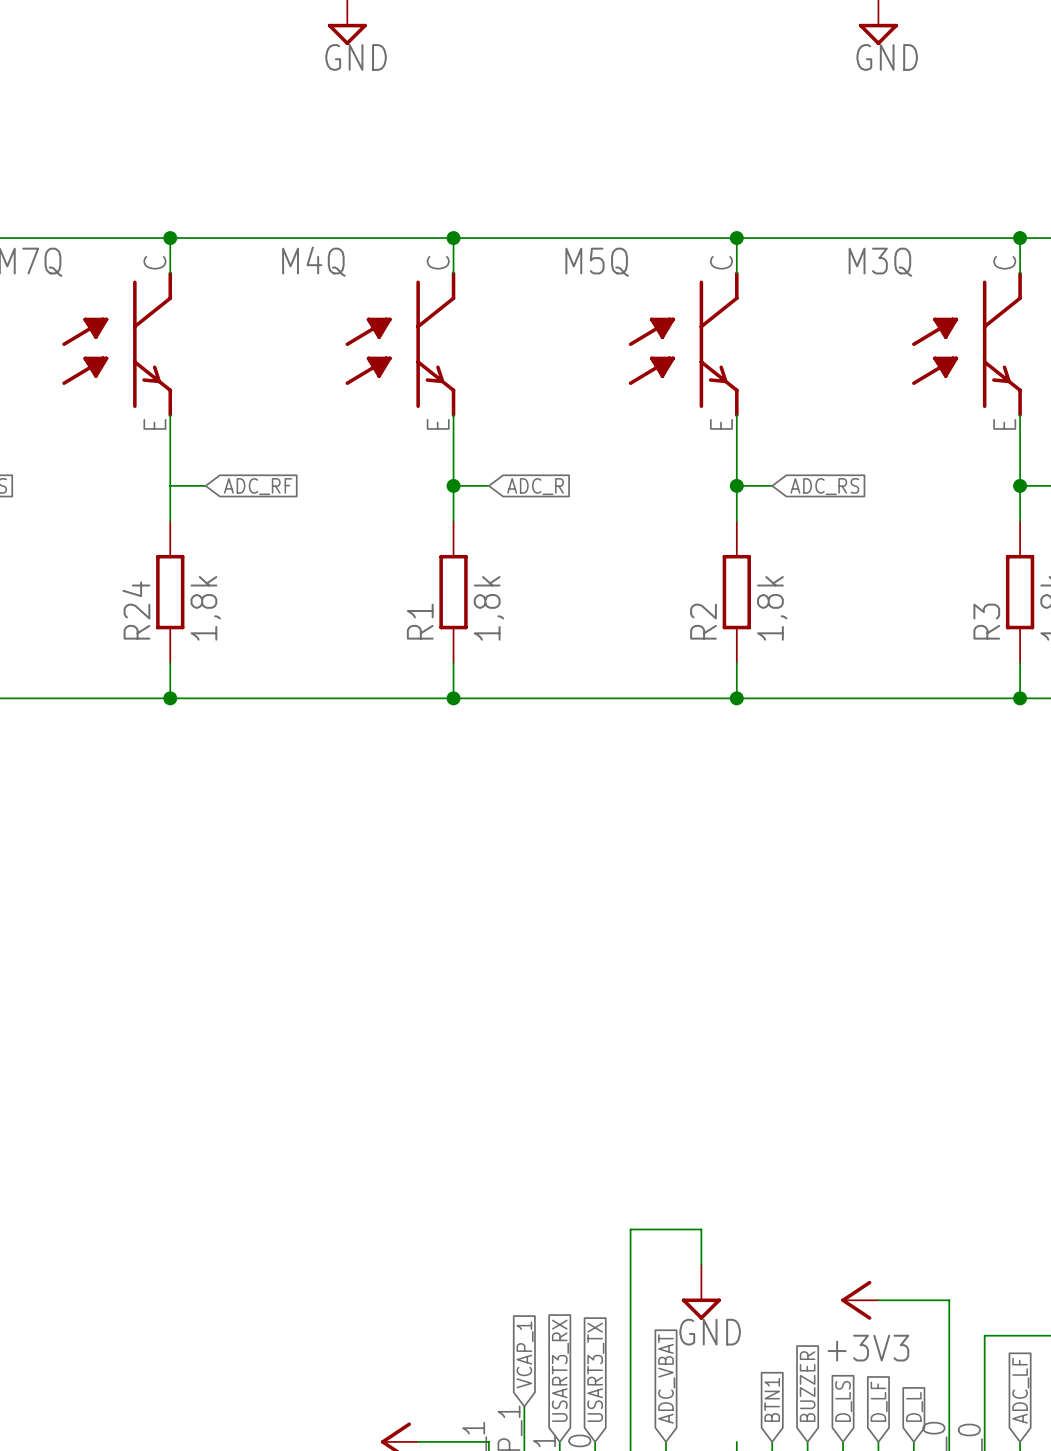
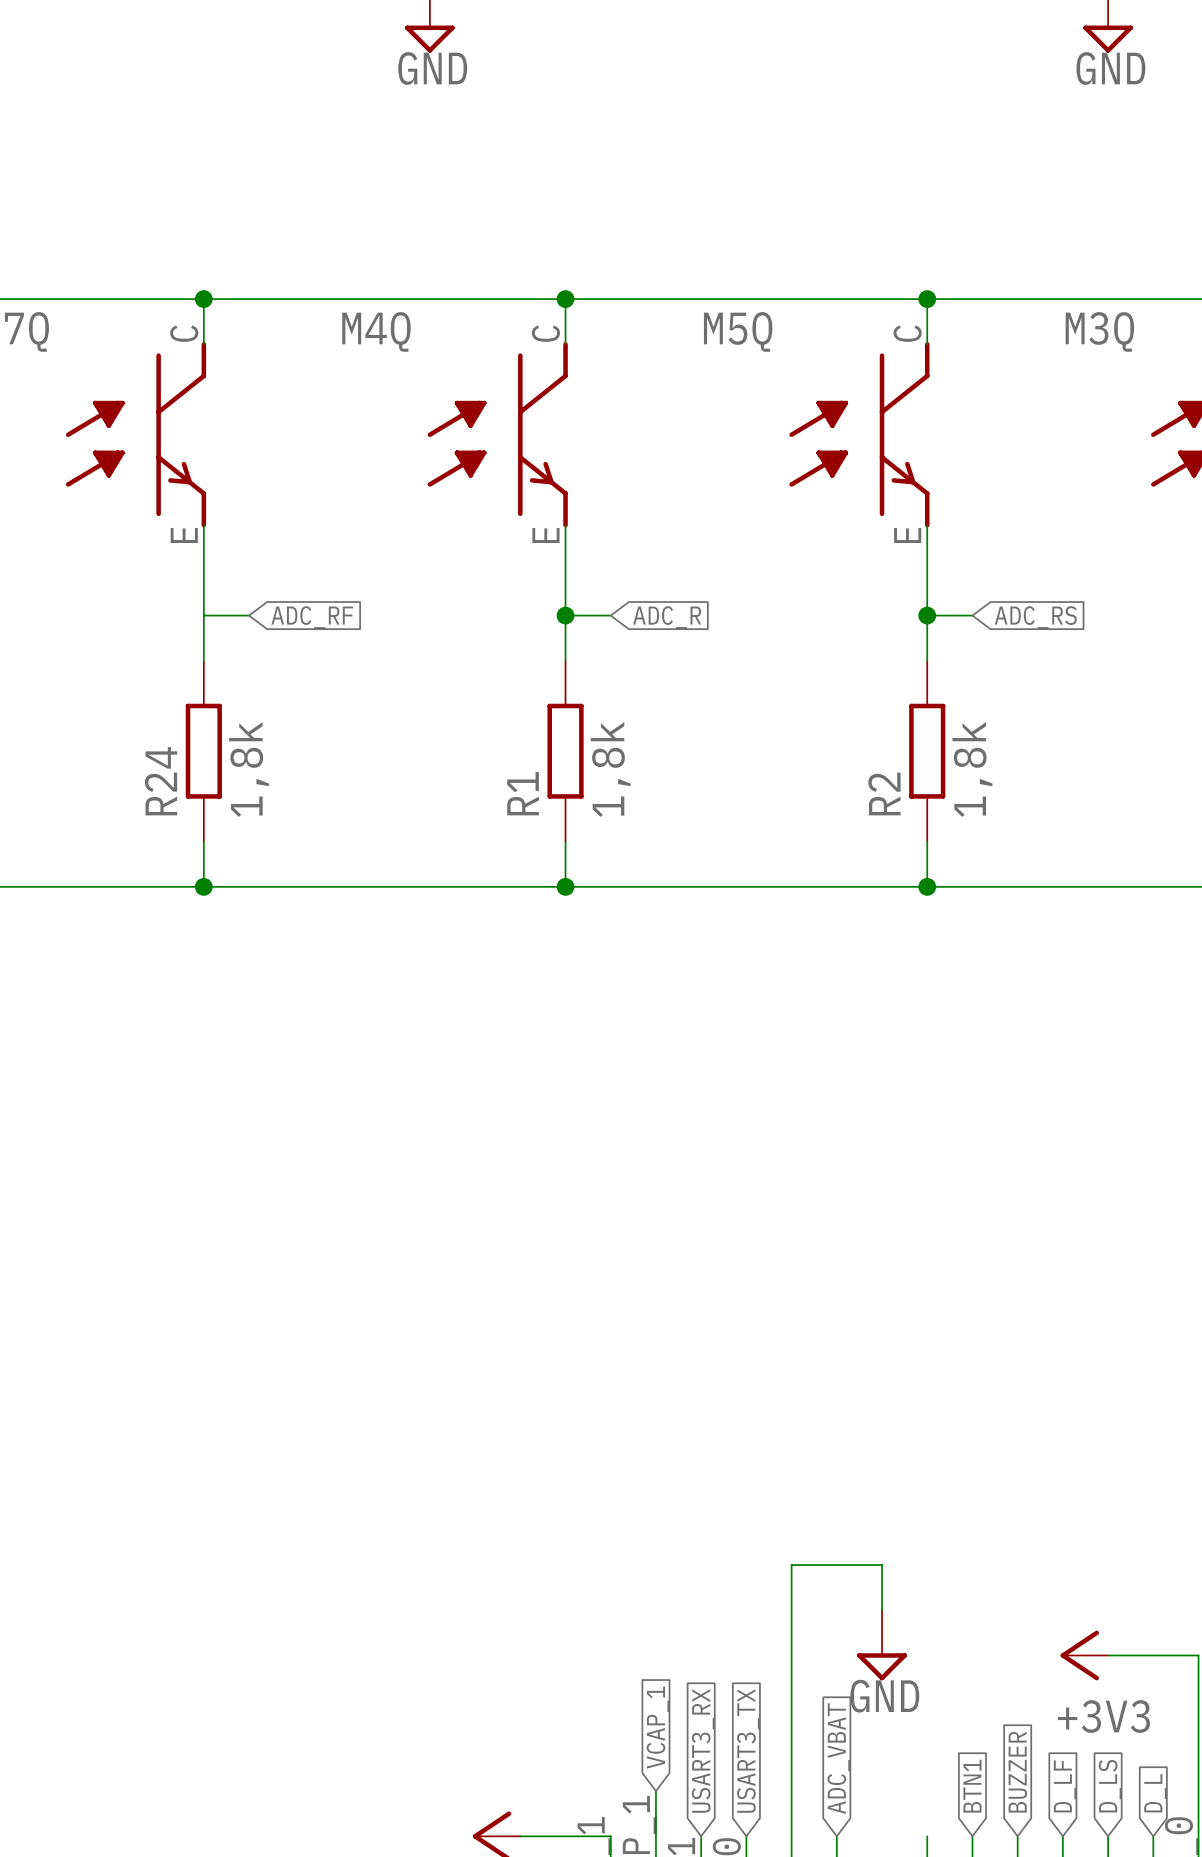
global label: D_LS (843, 1401) -> D_LF (1065, 1786)
global label: D_LF (879, 1401) -> D_LS (1110, 1786)

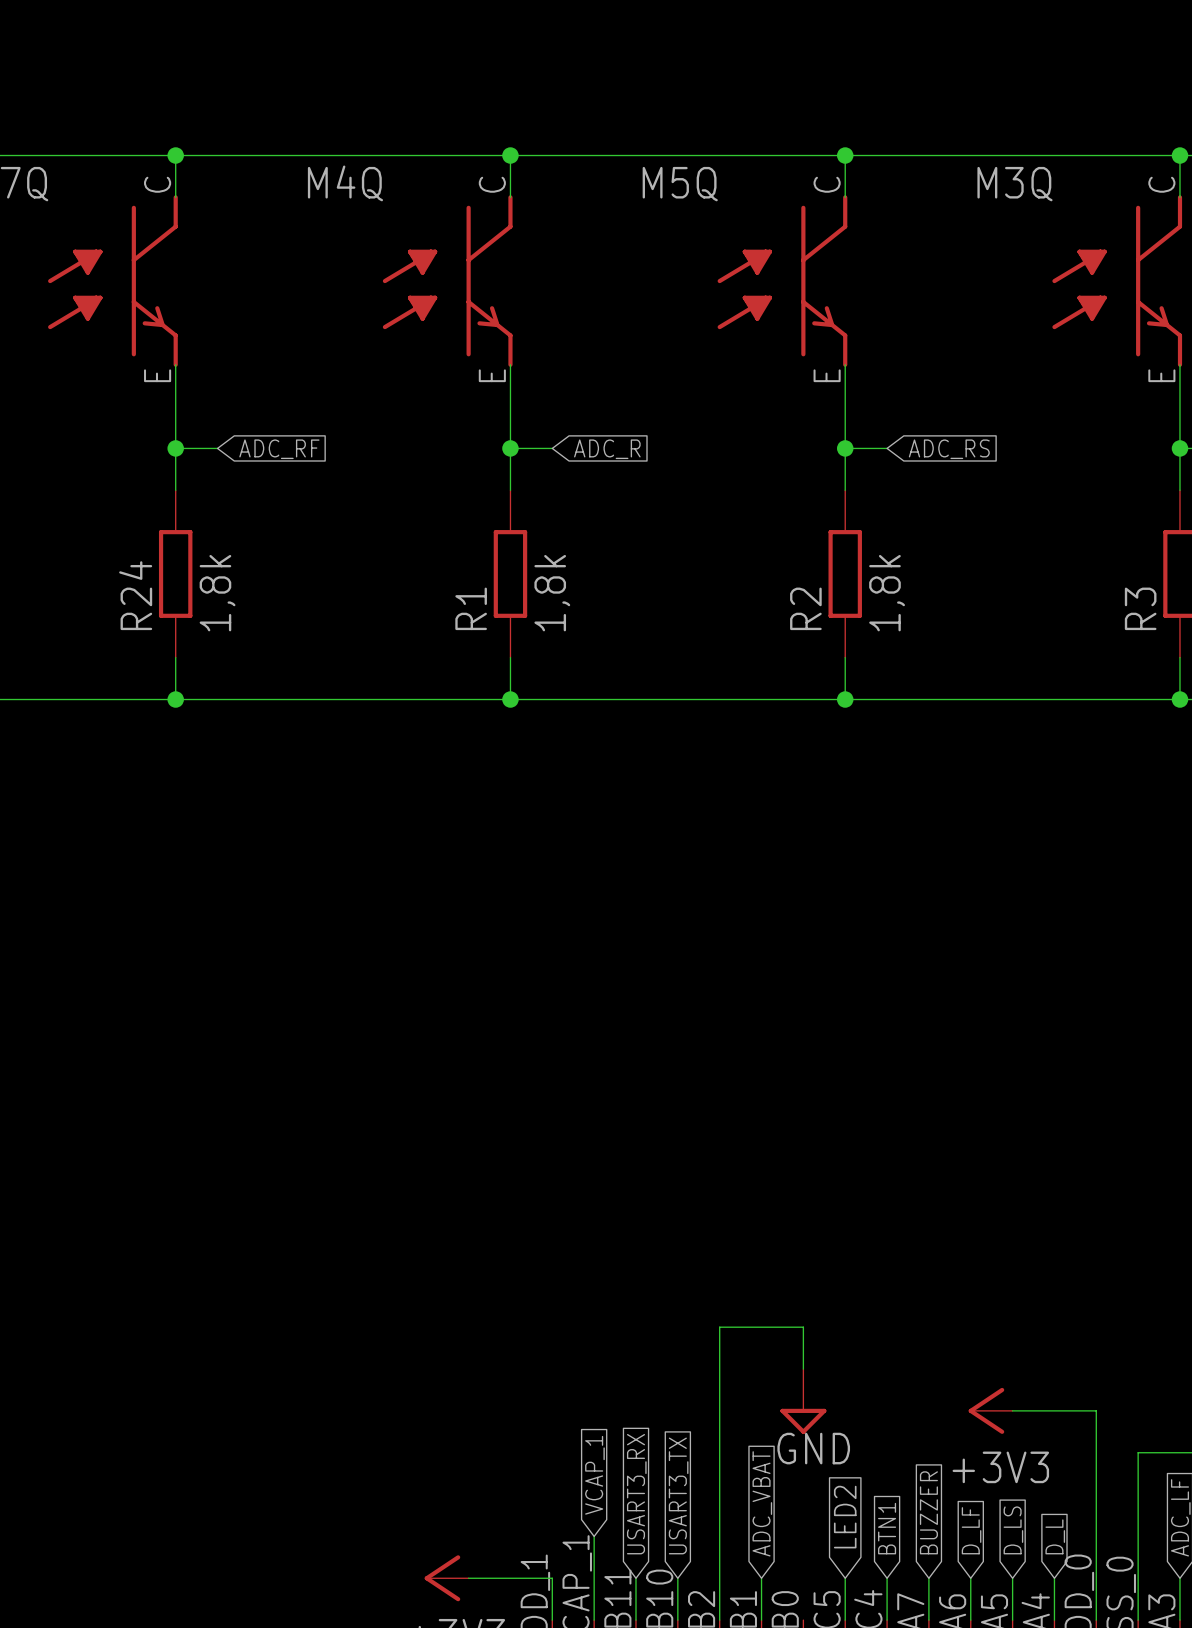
junction: none -> (175, 448)
global label: none -> LED2 (845, 1517)

